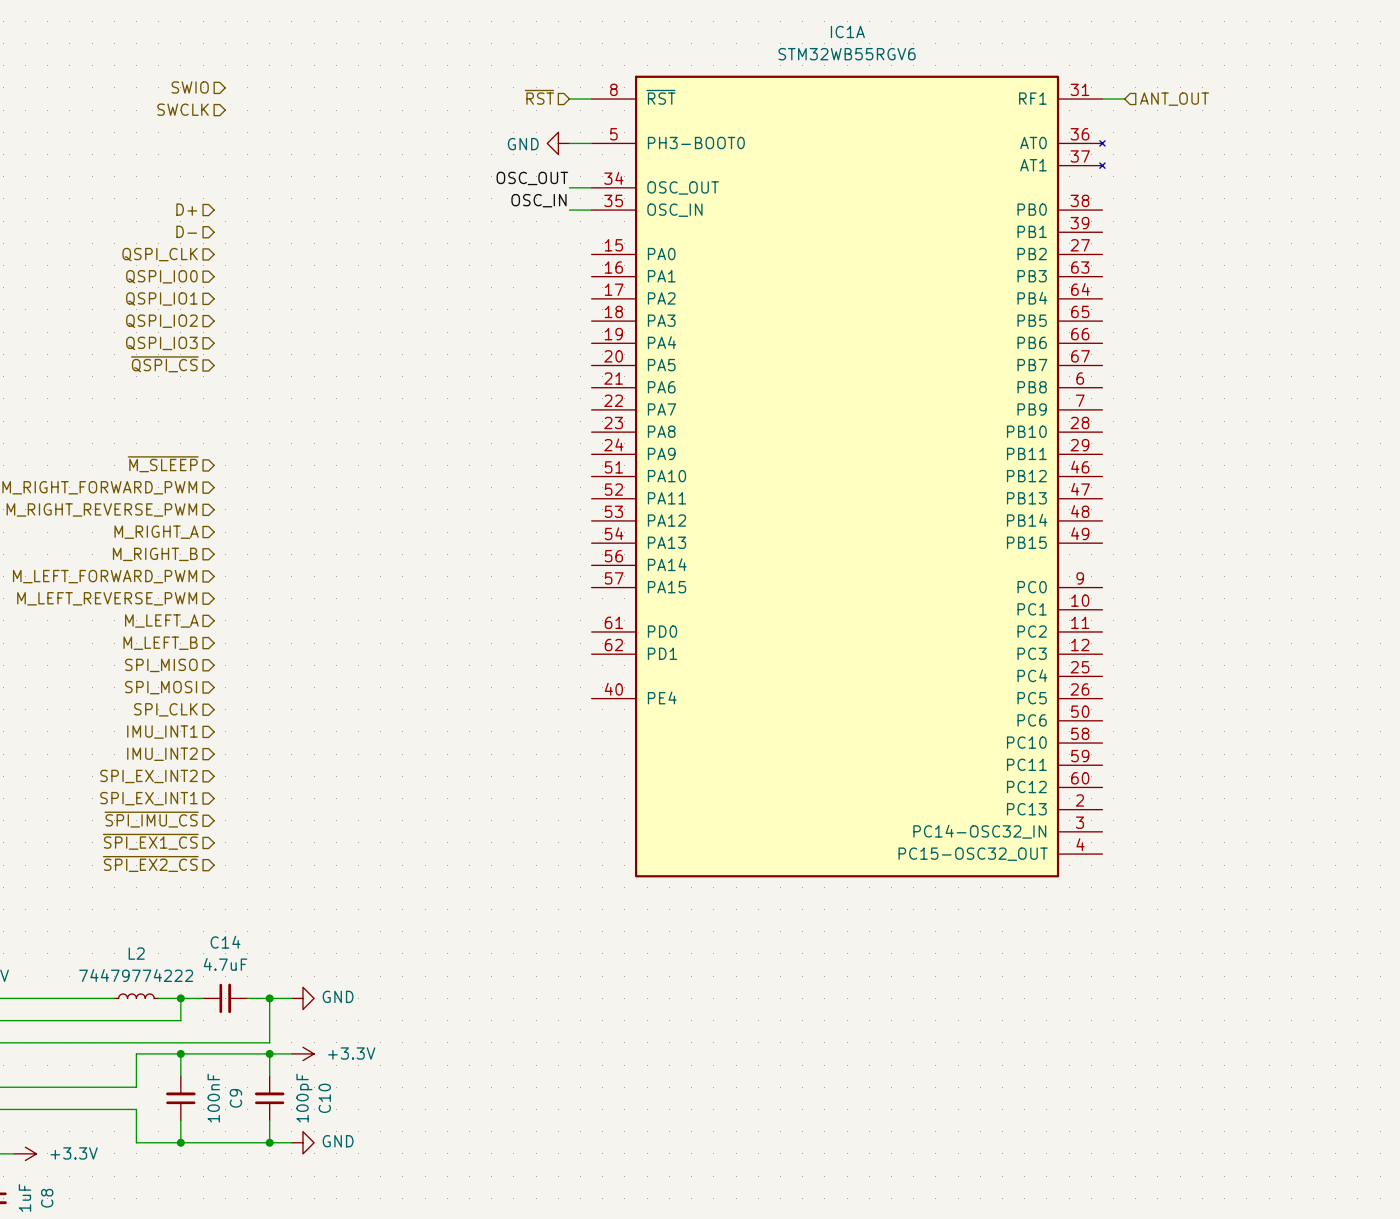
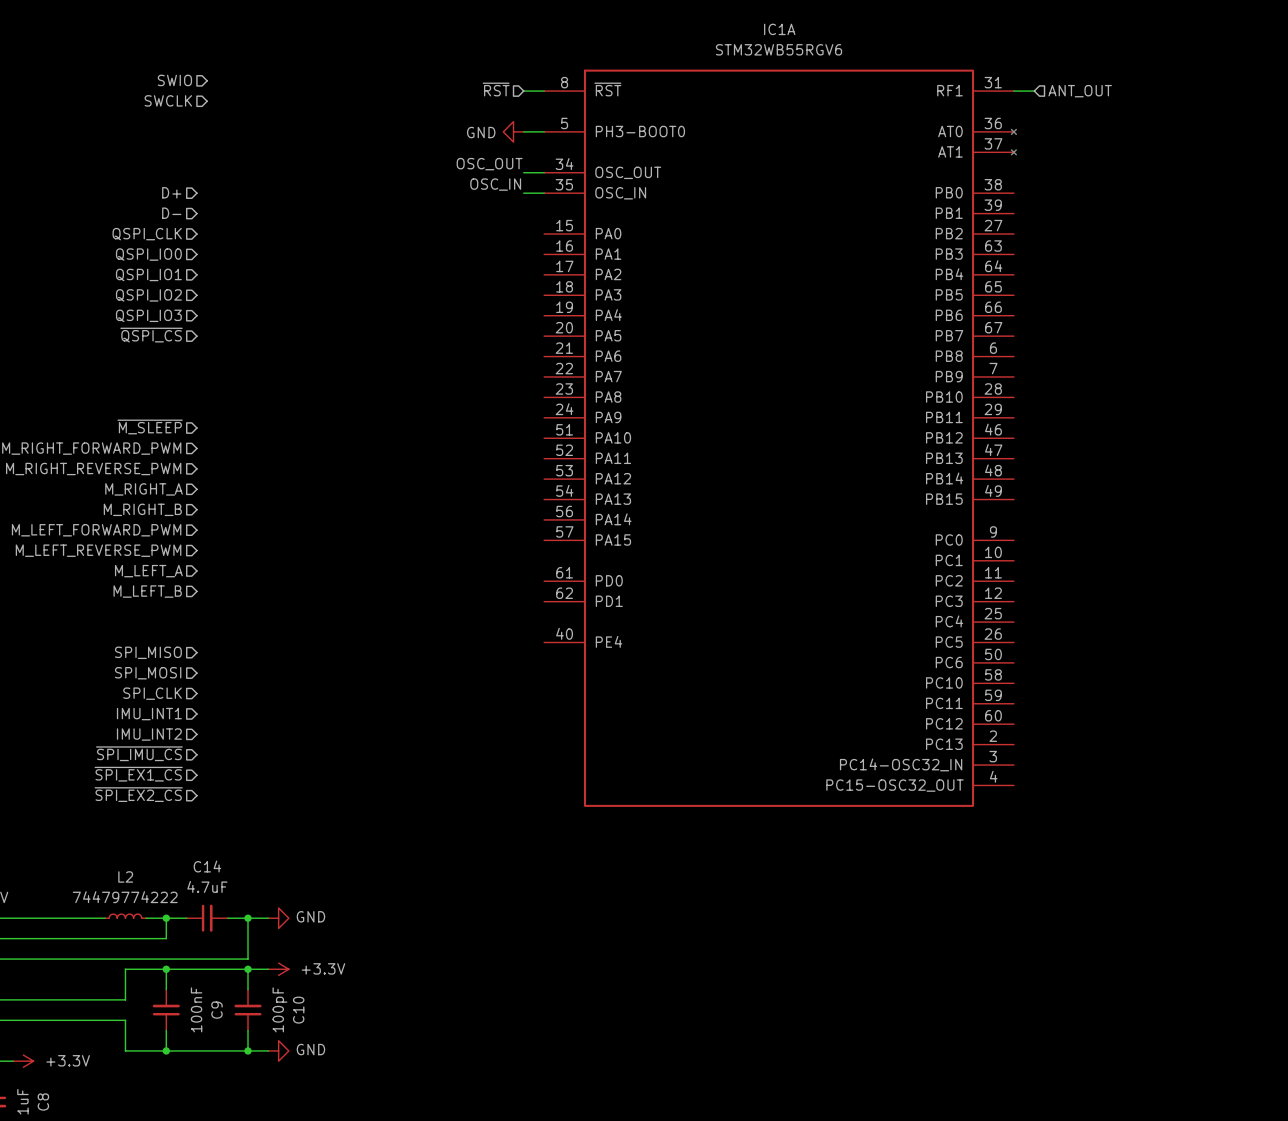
hierarchical label: SPI_MISO (161, 665) -> none
hierarchical label: SPI_MOSI (161, 687) -> none
hierarchical label: SPI_CLK (165, 709) -> SPI_MISO (148, 652)
hierarchical label: IMU_INT1 (162, 732) -> SPI_MOSI (148, 673)
hierarchical label: IMU_INT2 (162, 754) -> SPI_CLK (152, 693)
hierarchical label: SPI_EX_INT2 (148, 776) -> IMU_INT1 (149, 714)
hierarchical label: SPI_EX_INT1 (148, 798) -> IMU_INT2 (149, 734)

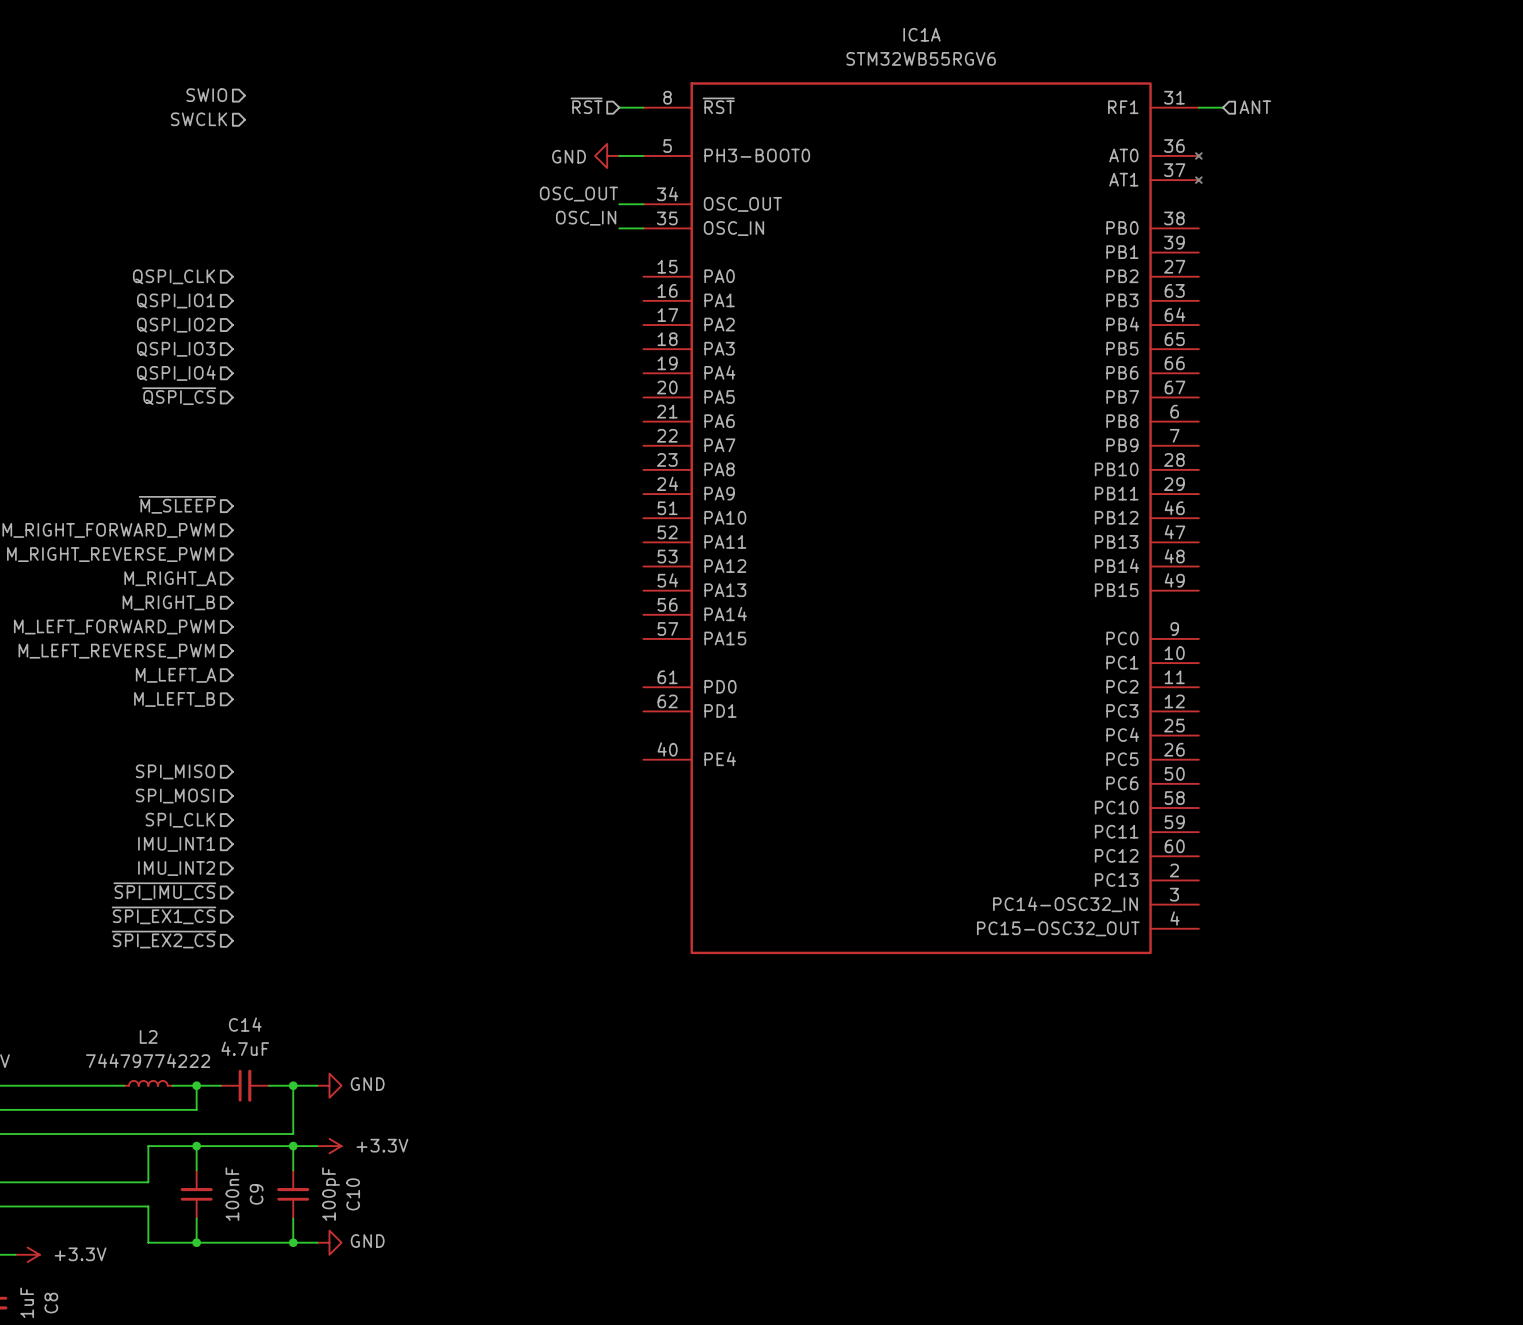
hierarchical label: ANT_OUT (1080, 91) -> ANT (1255, 107)
hierarchical label: D+ (171, 192) -> none
hierarchical label: D- (171, 213) -> none
hierarchical label: QSPI_IO0 (148, 254) -> QSPI_IO1 (176, 300)
hierarchical label: QSPI_IO1 (148, 274) -> QSPI_IO2 (176, 325)
hierarchical label: QSPI_IO2 (148, 295) -> QSPI_IO3 (176, 349)
hierarchical label: QSPI_IO3 (148, 315) -> QSPI_IO4 (176, 373)

